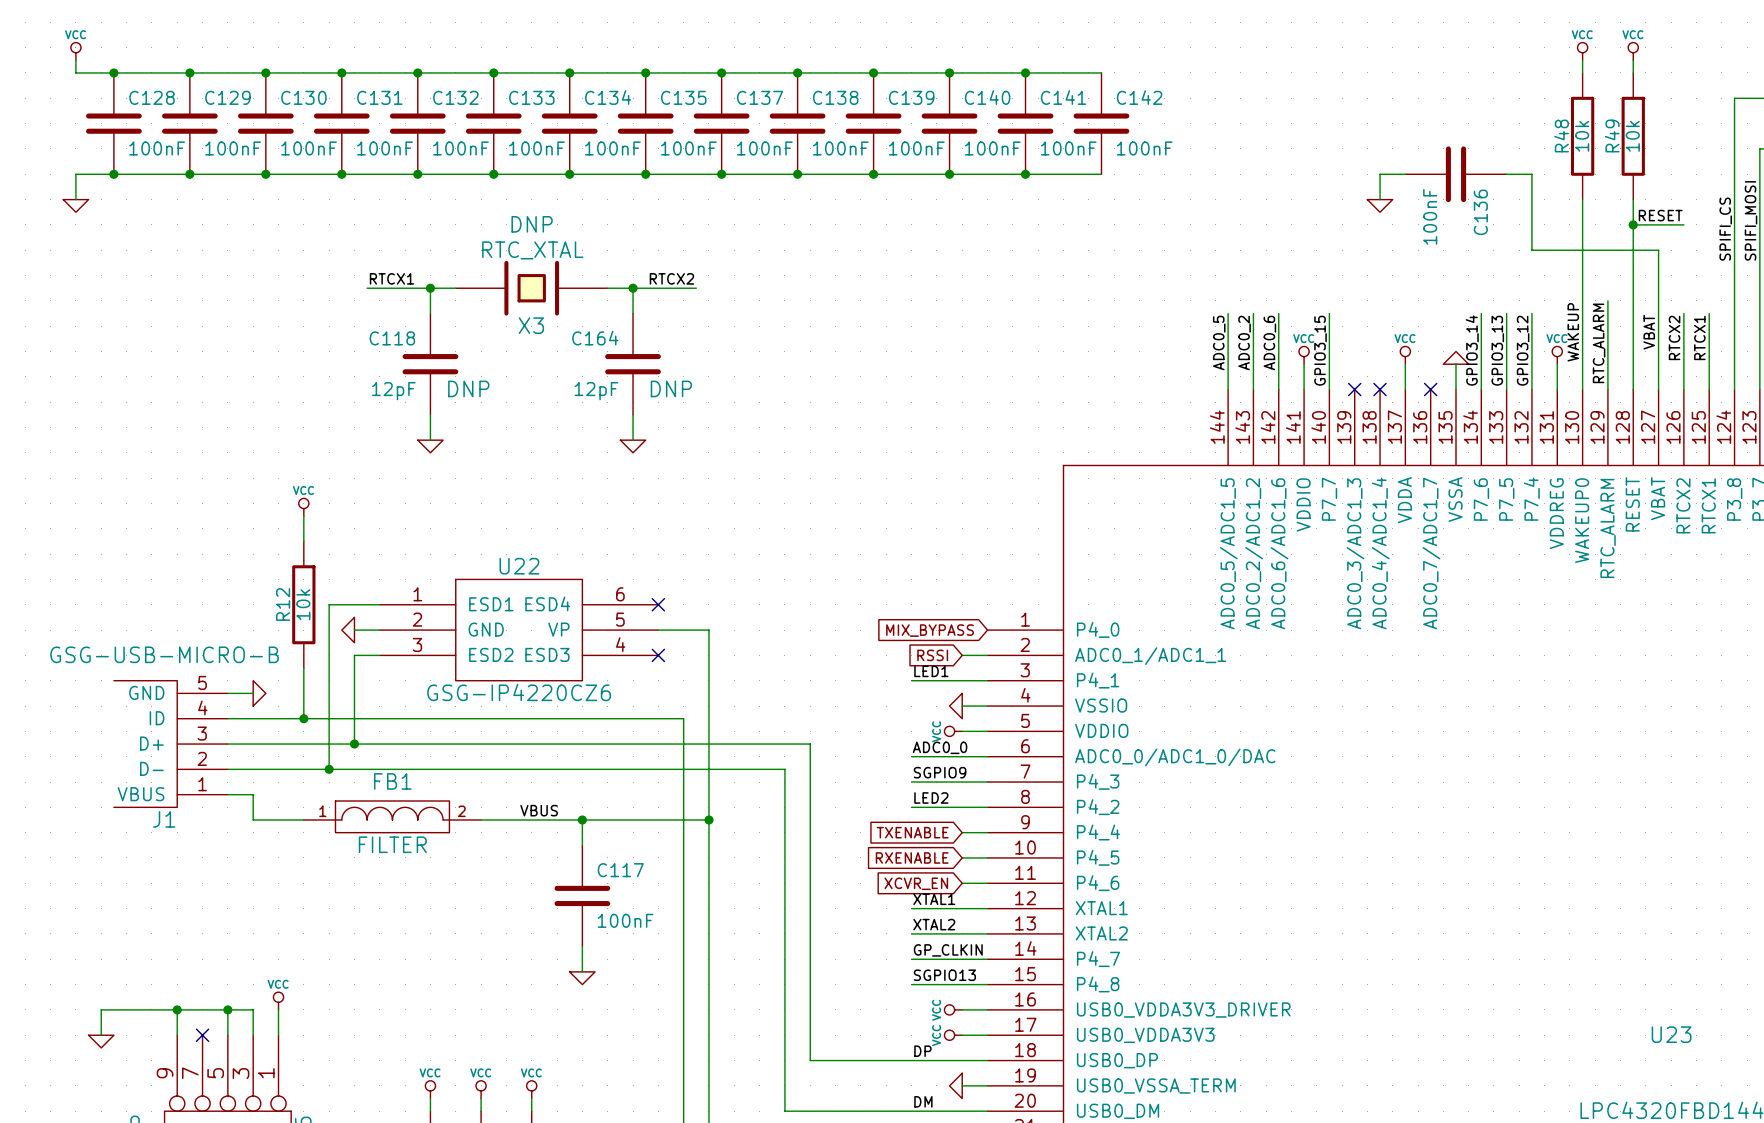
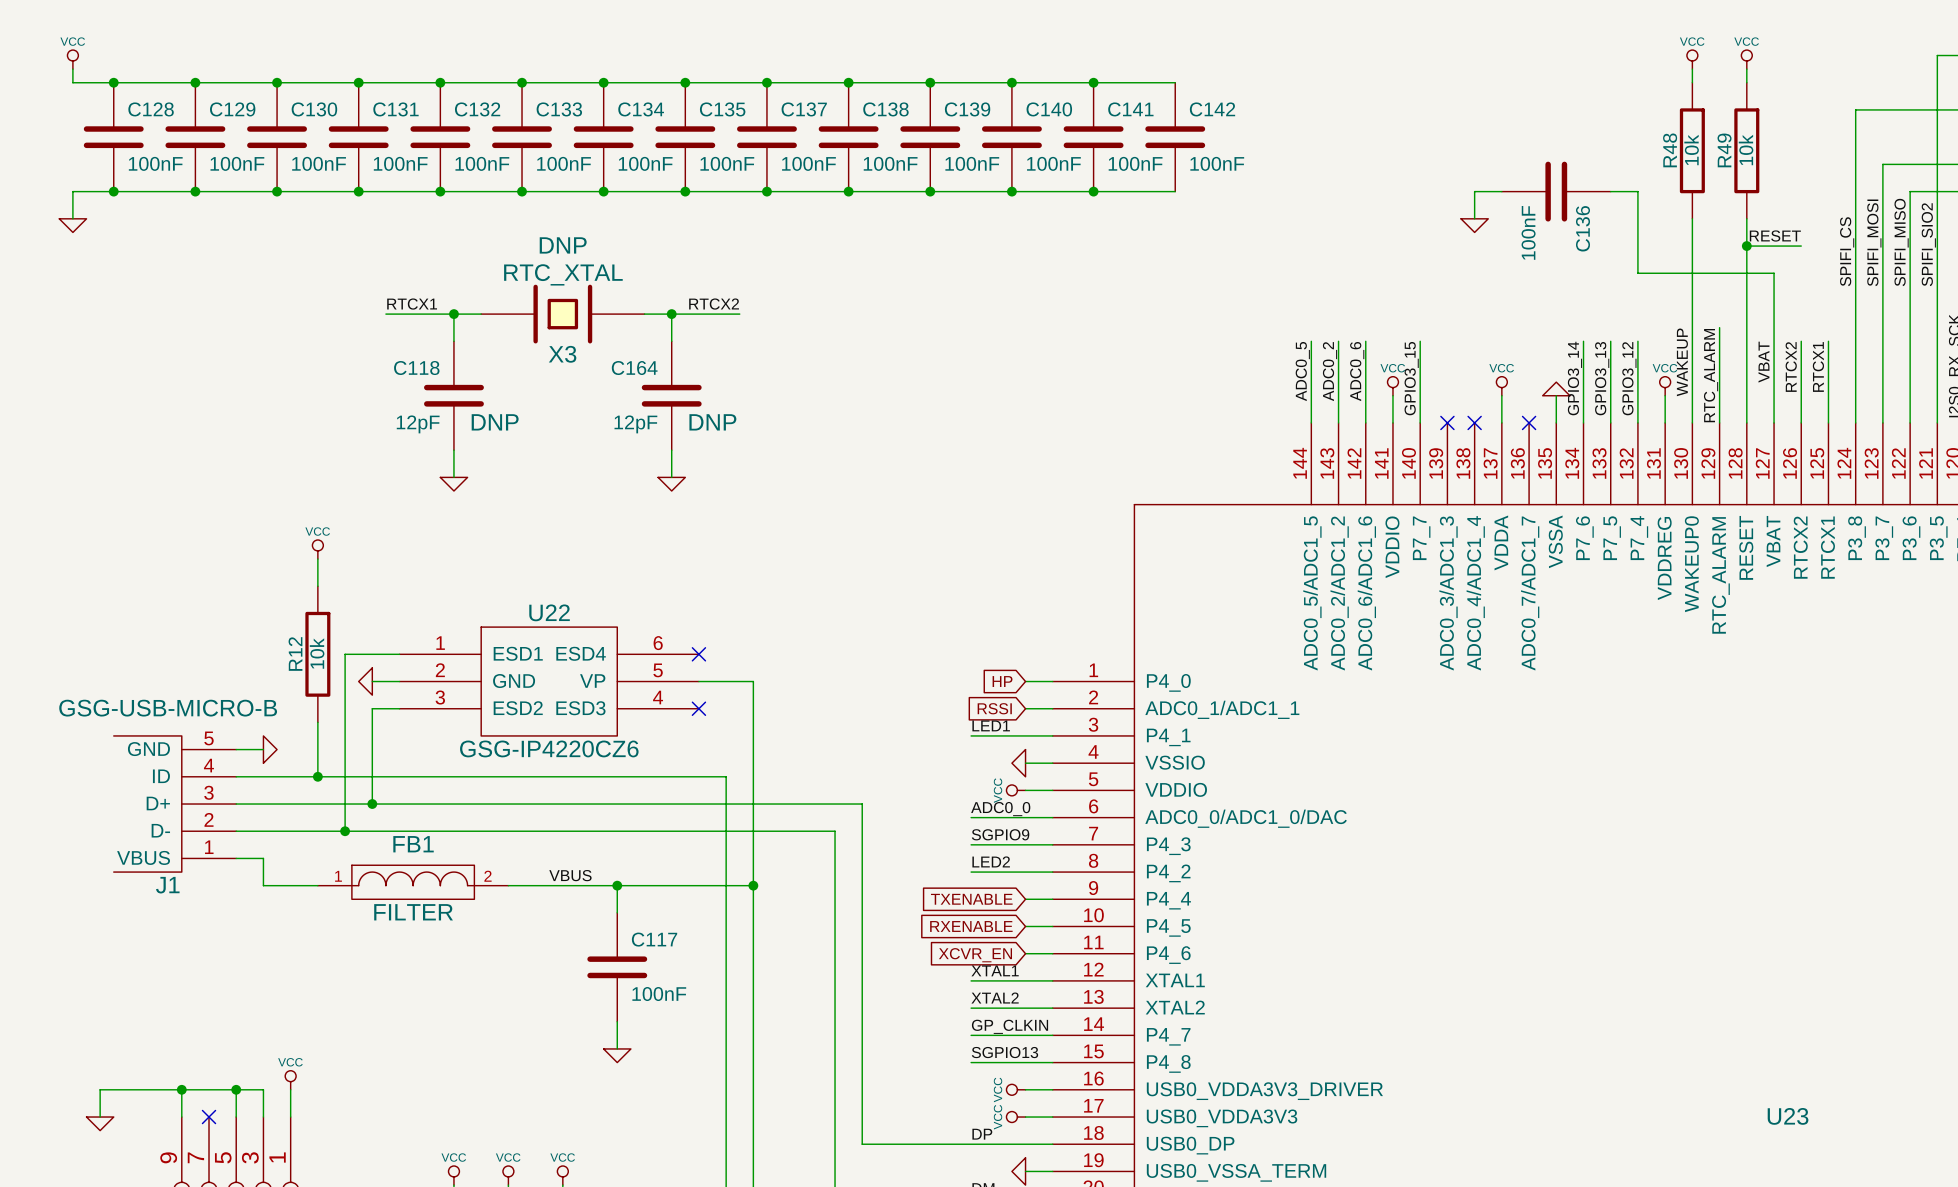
global label: MIX_BYPASS (930, 630) -> none
global label: none -> HP (1002, 681)
wire: none -> (1025, 681) (1052, 681)

